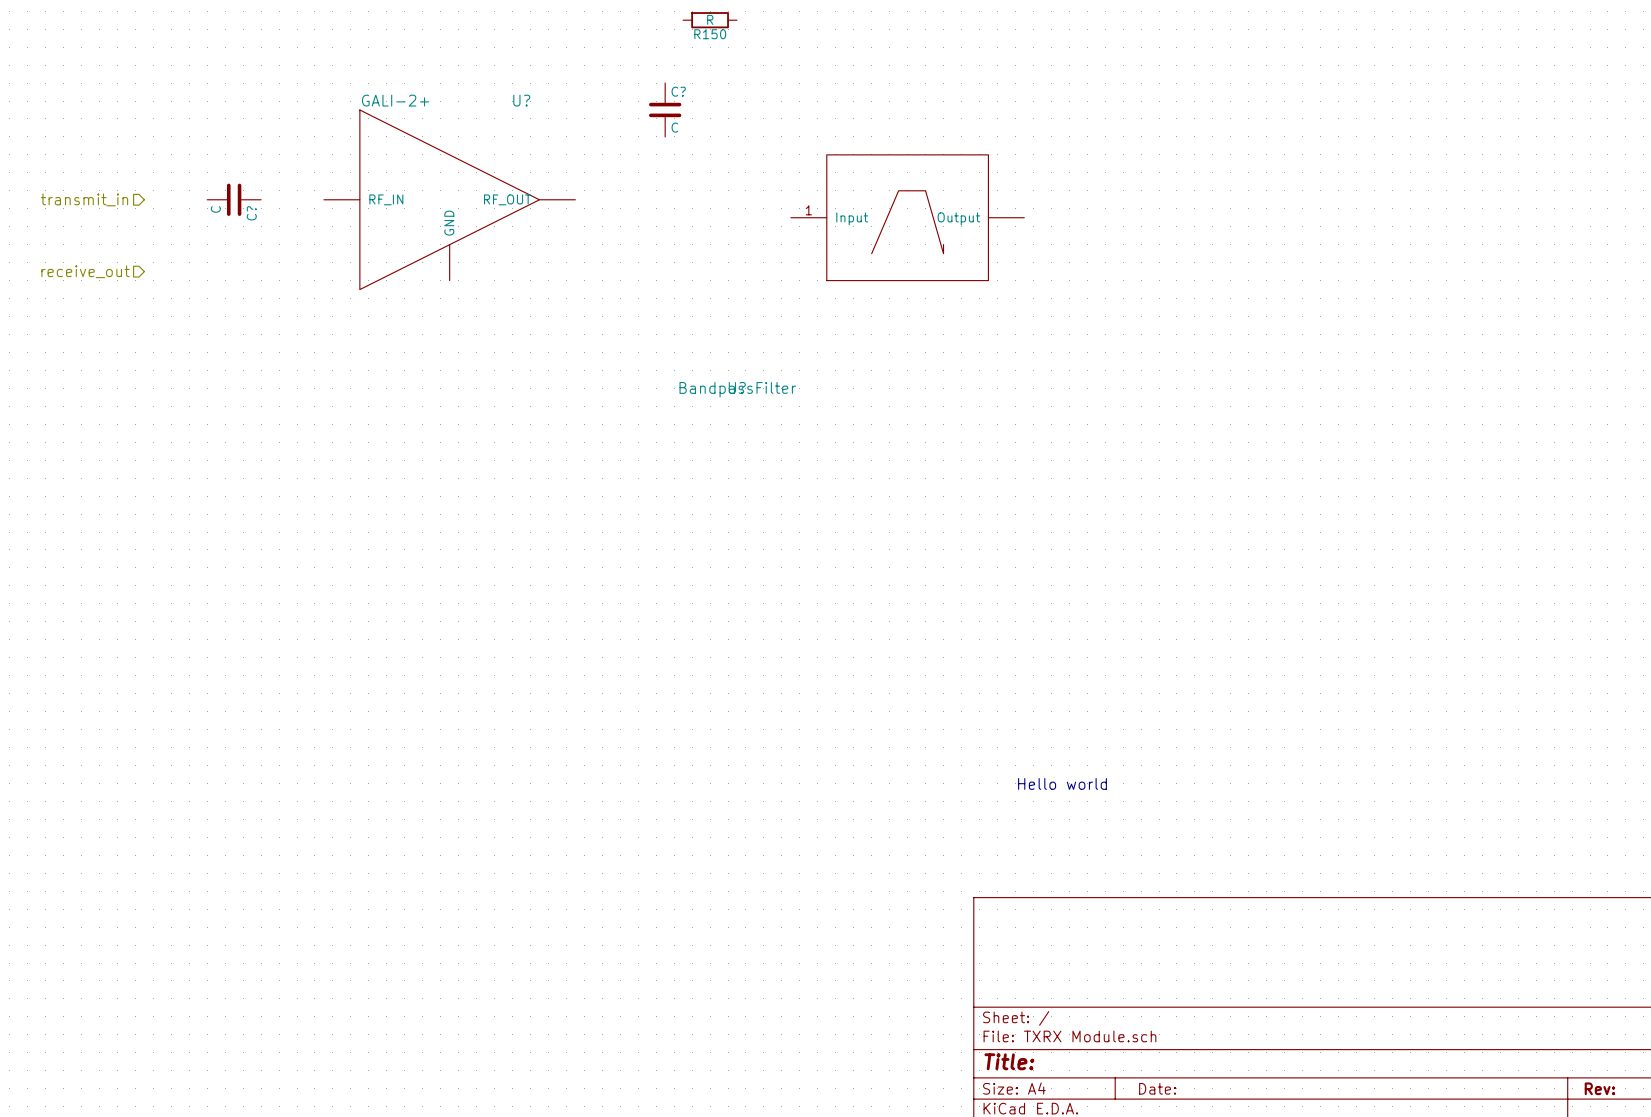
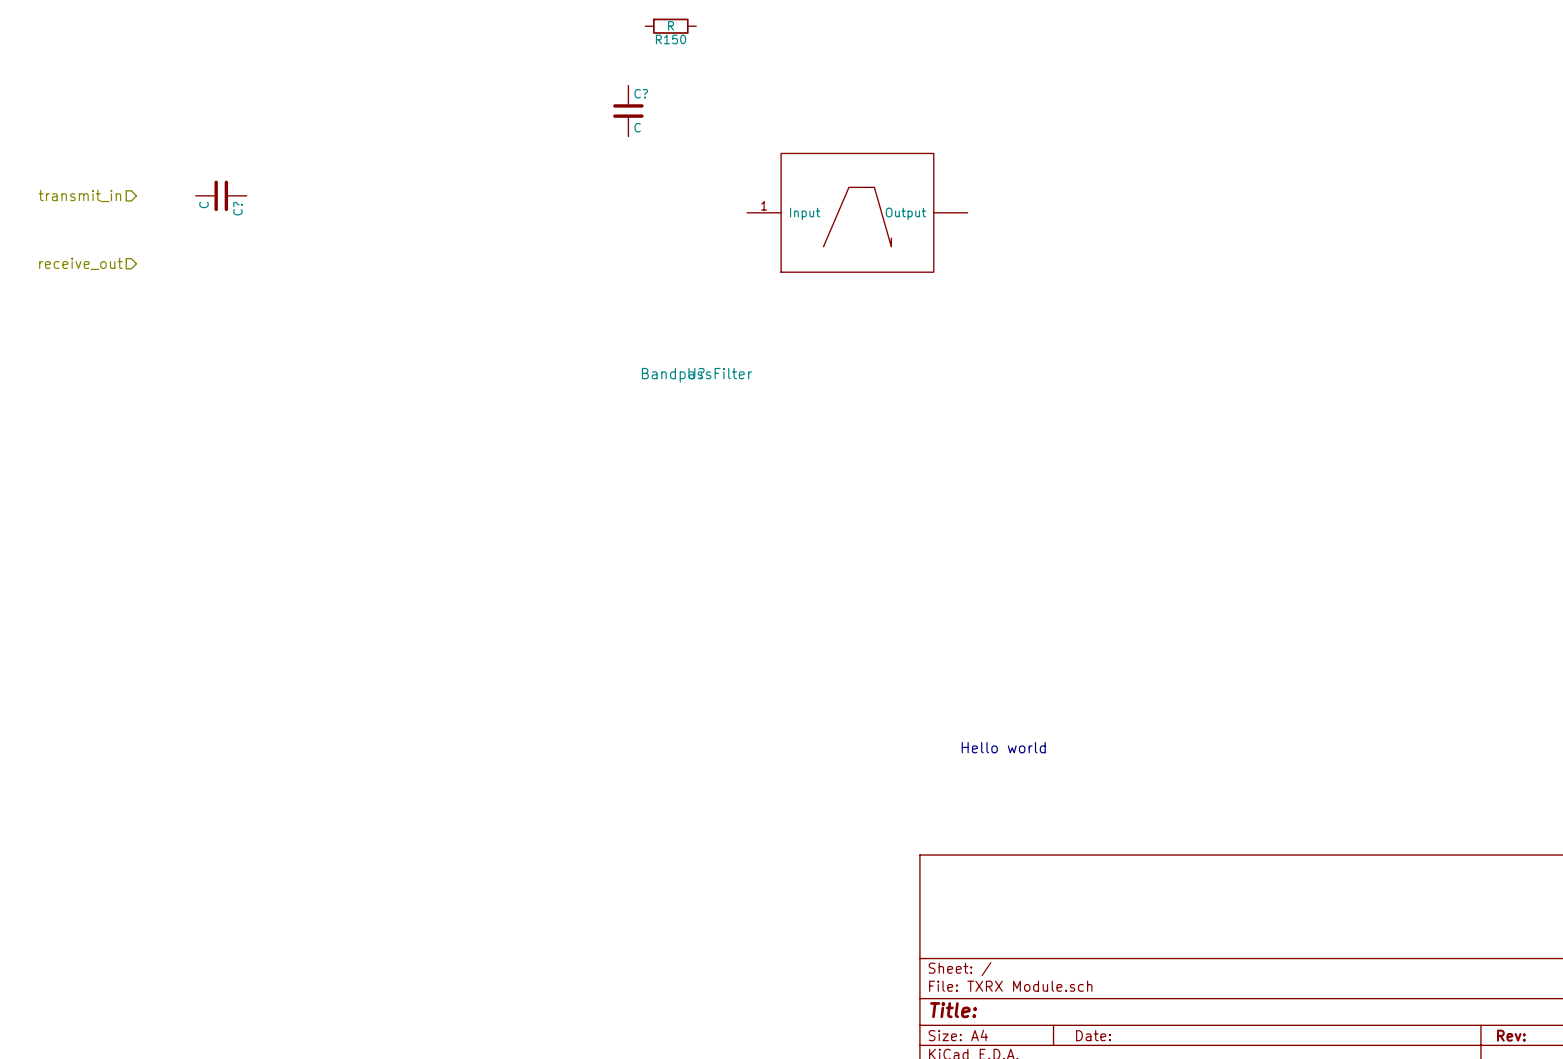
U?: GALI-2+ (449, 199) -> none

